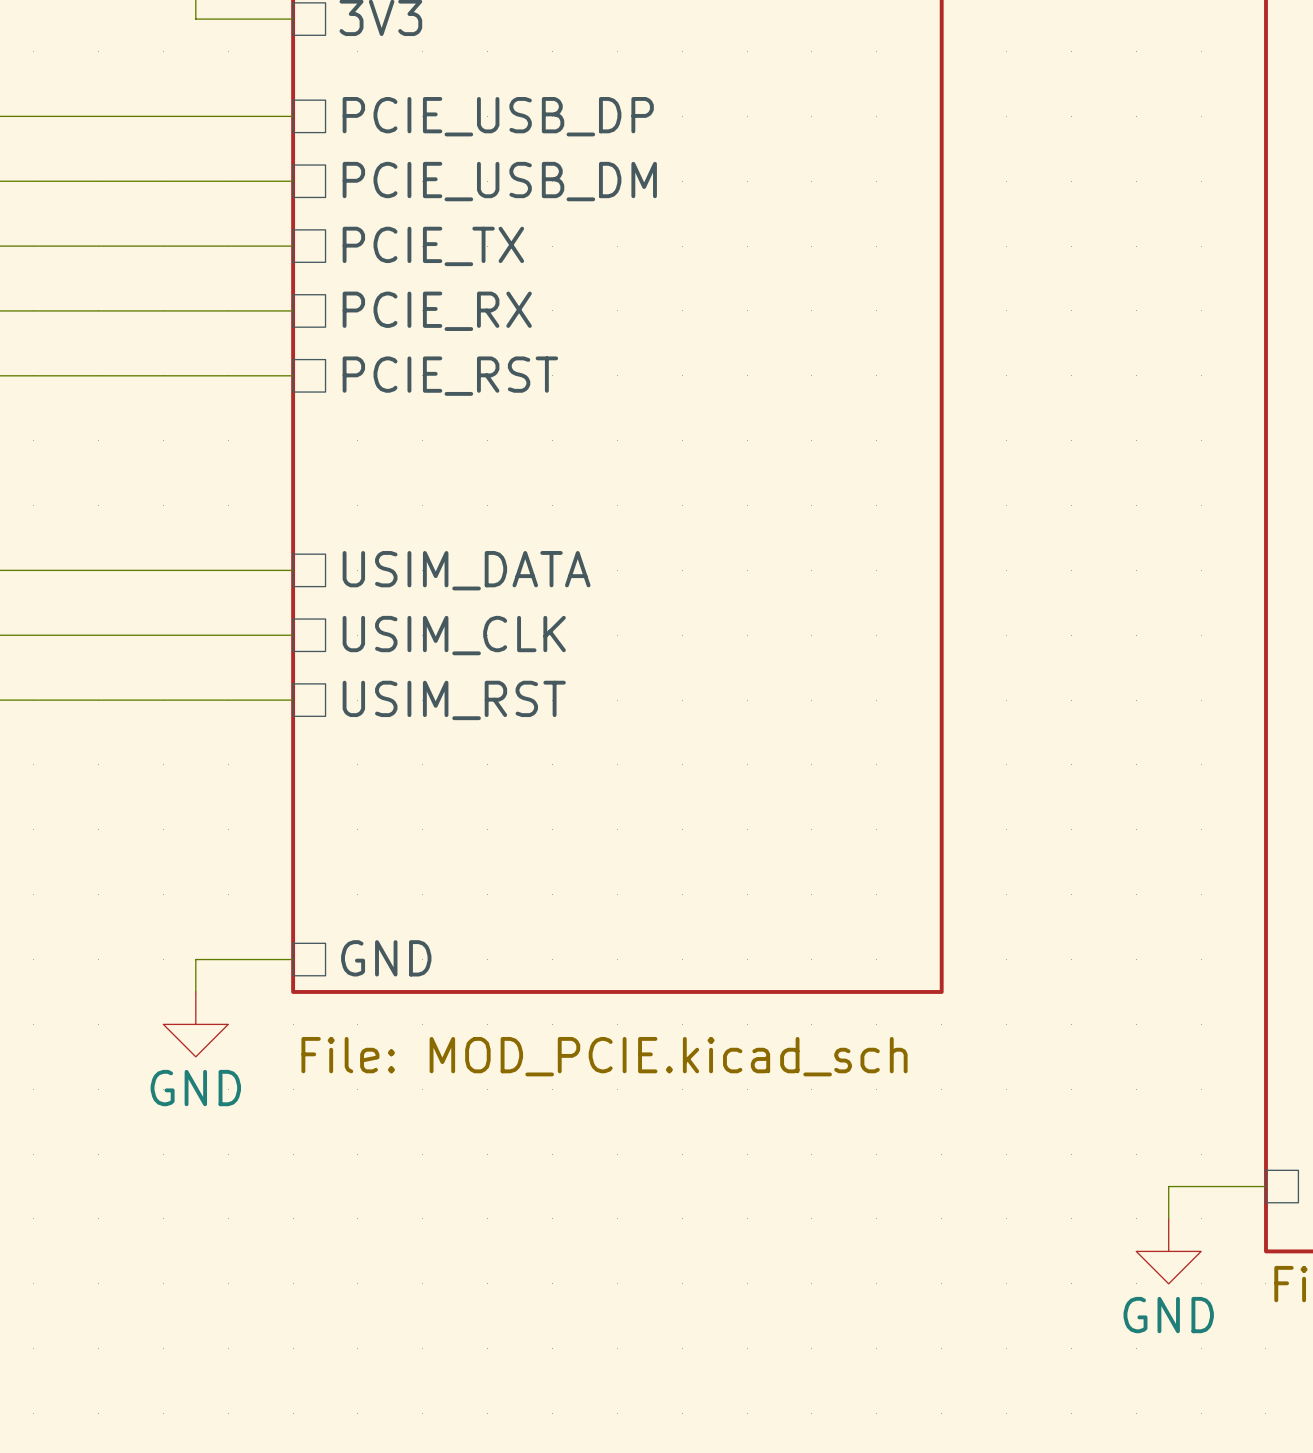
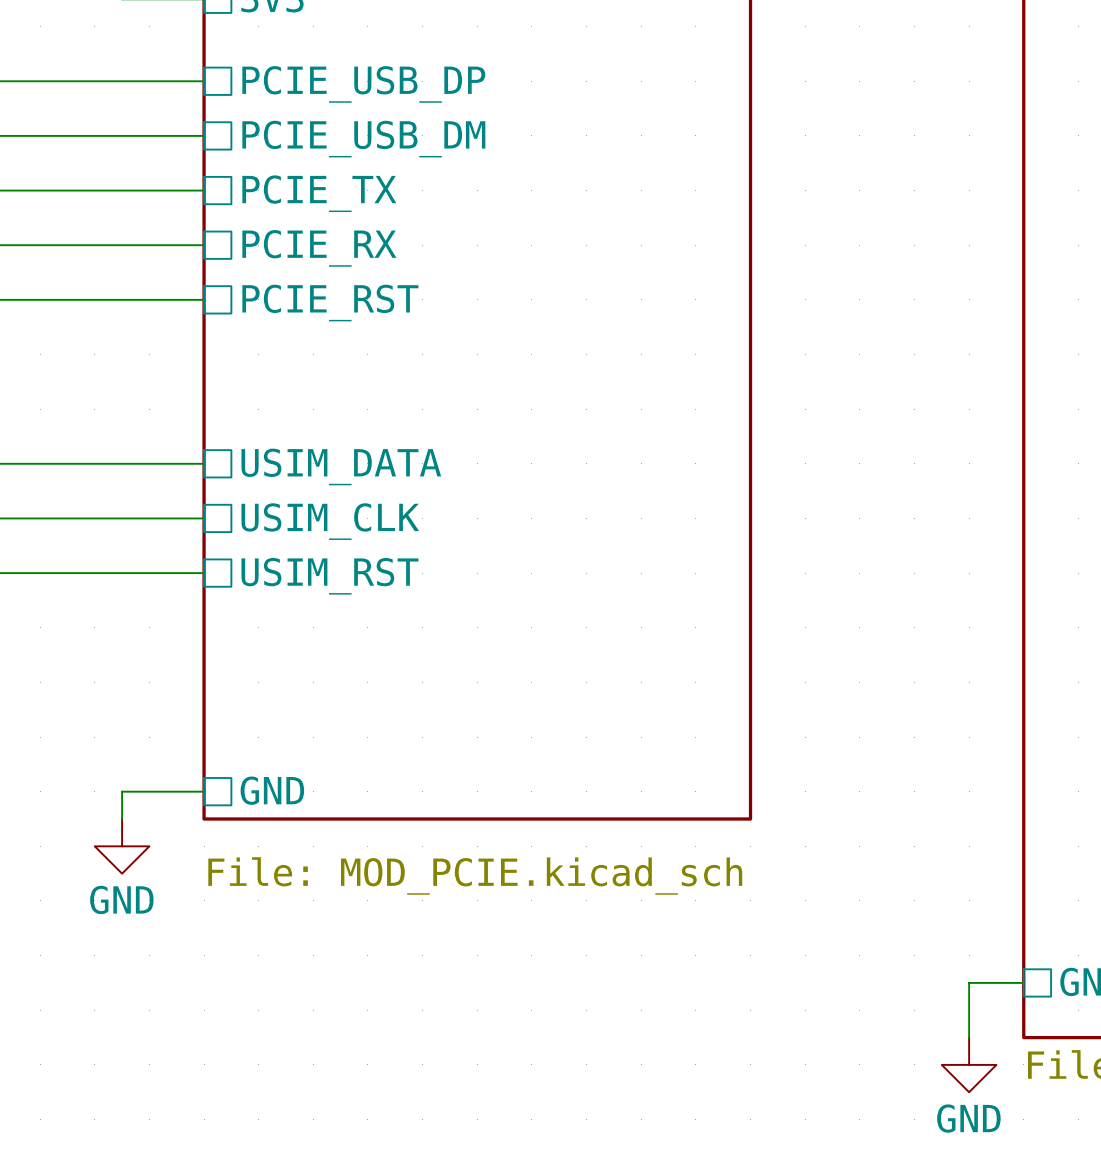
wire: (1201, 1186) (1168, 1186) (1168, 1218) -> (969, 982) (969, 1037)
power symbol position: GND (1168, 1251) -> GND (969, 1064)

